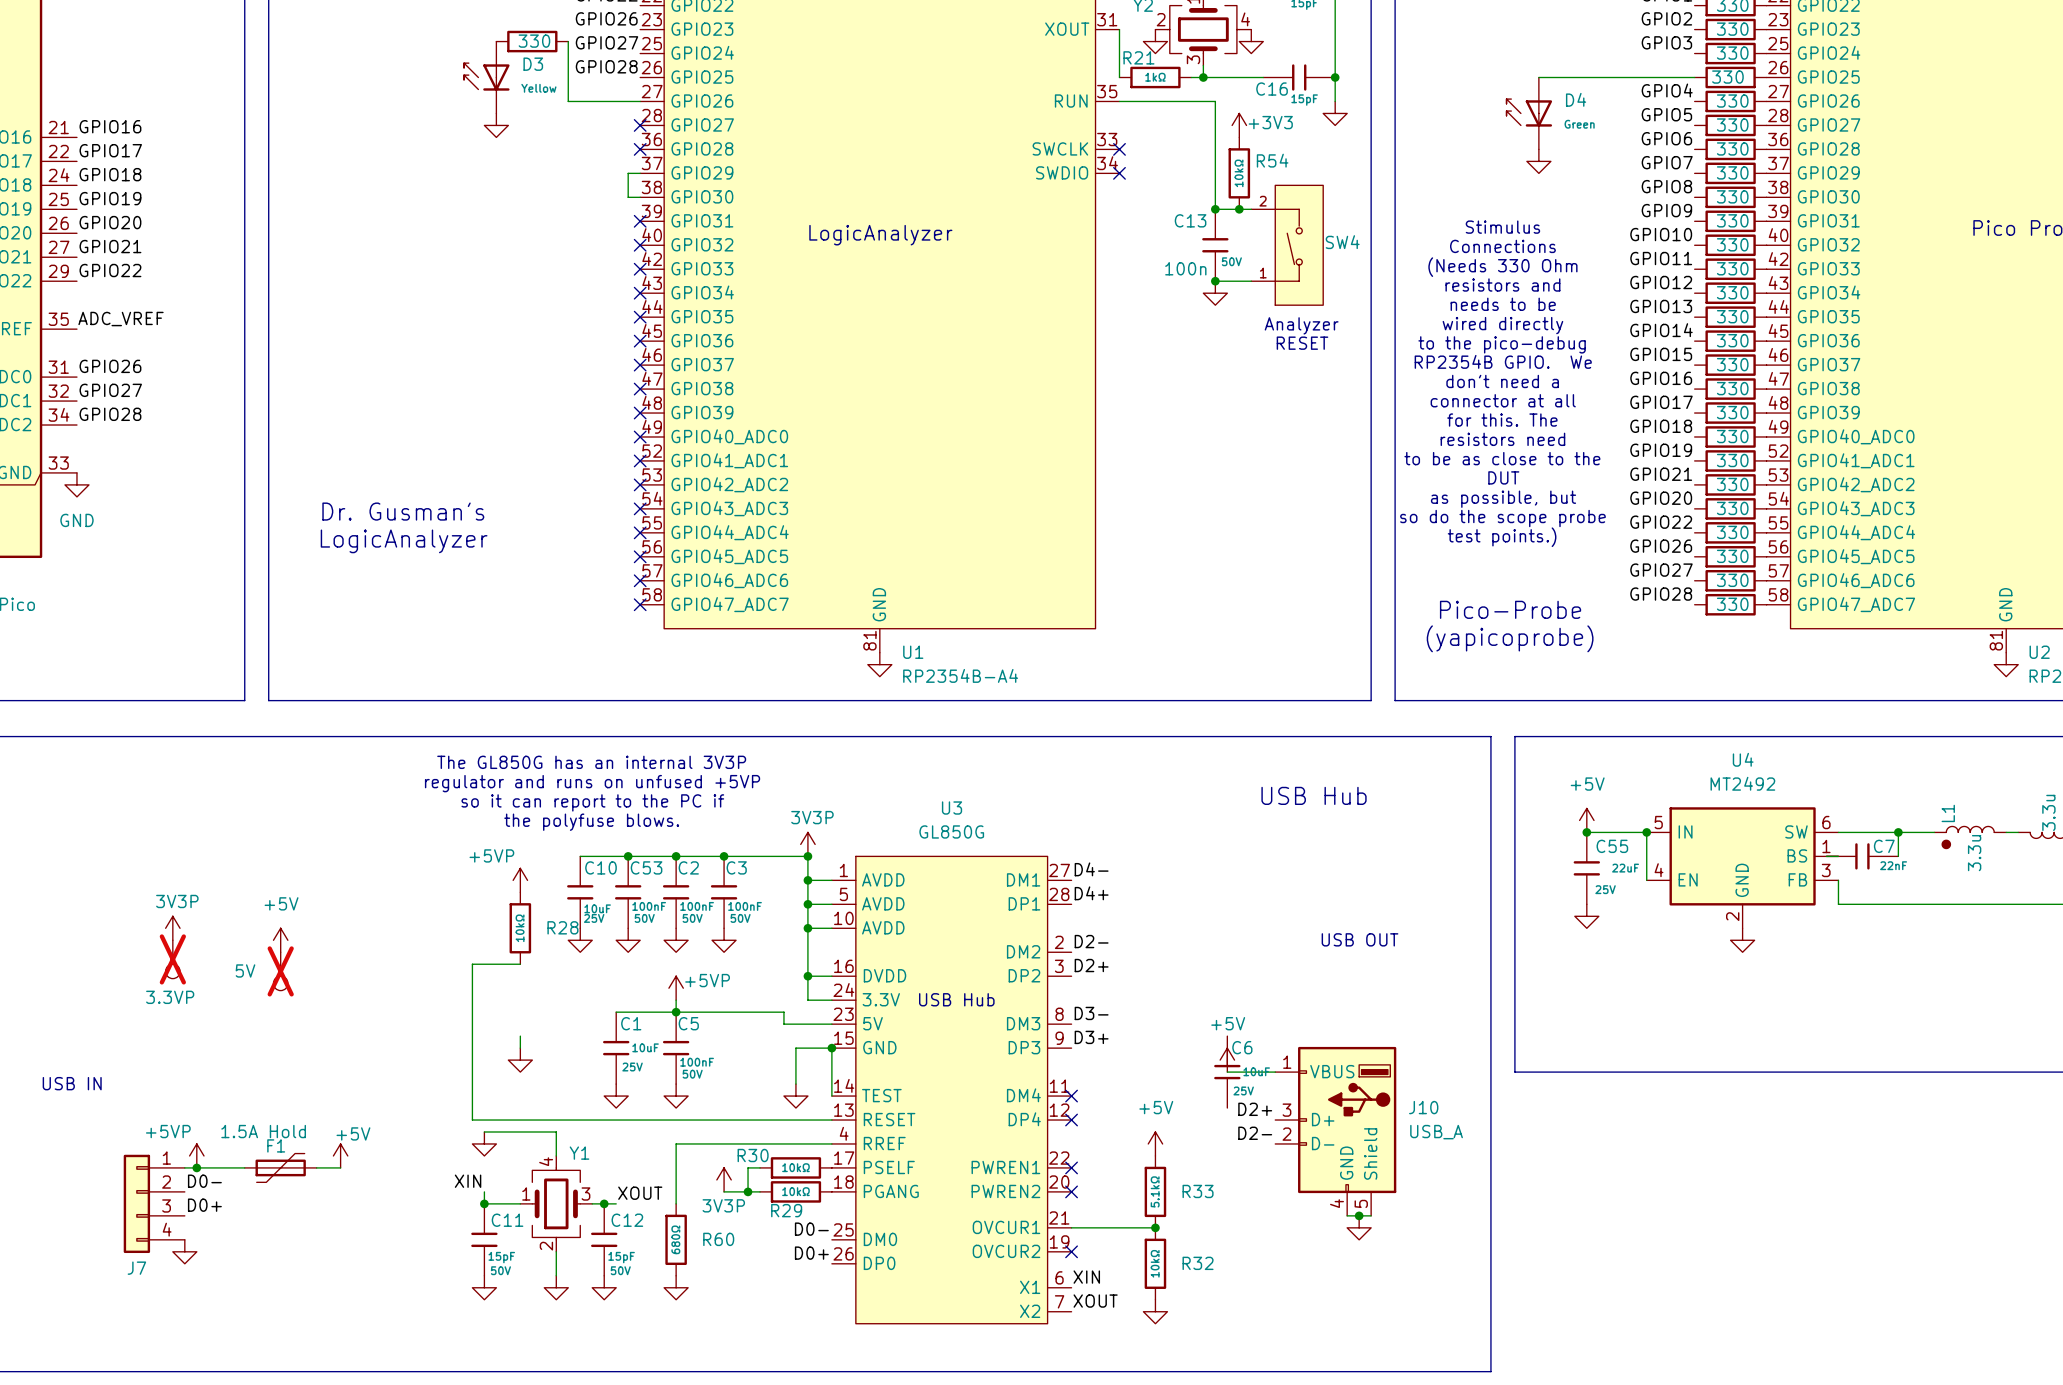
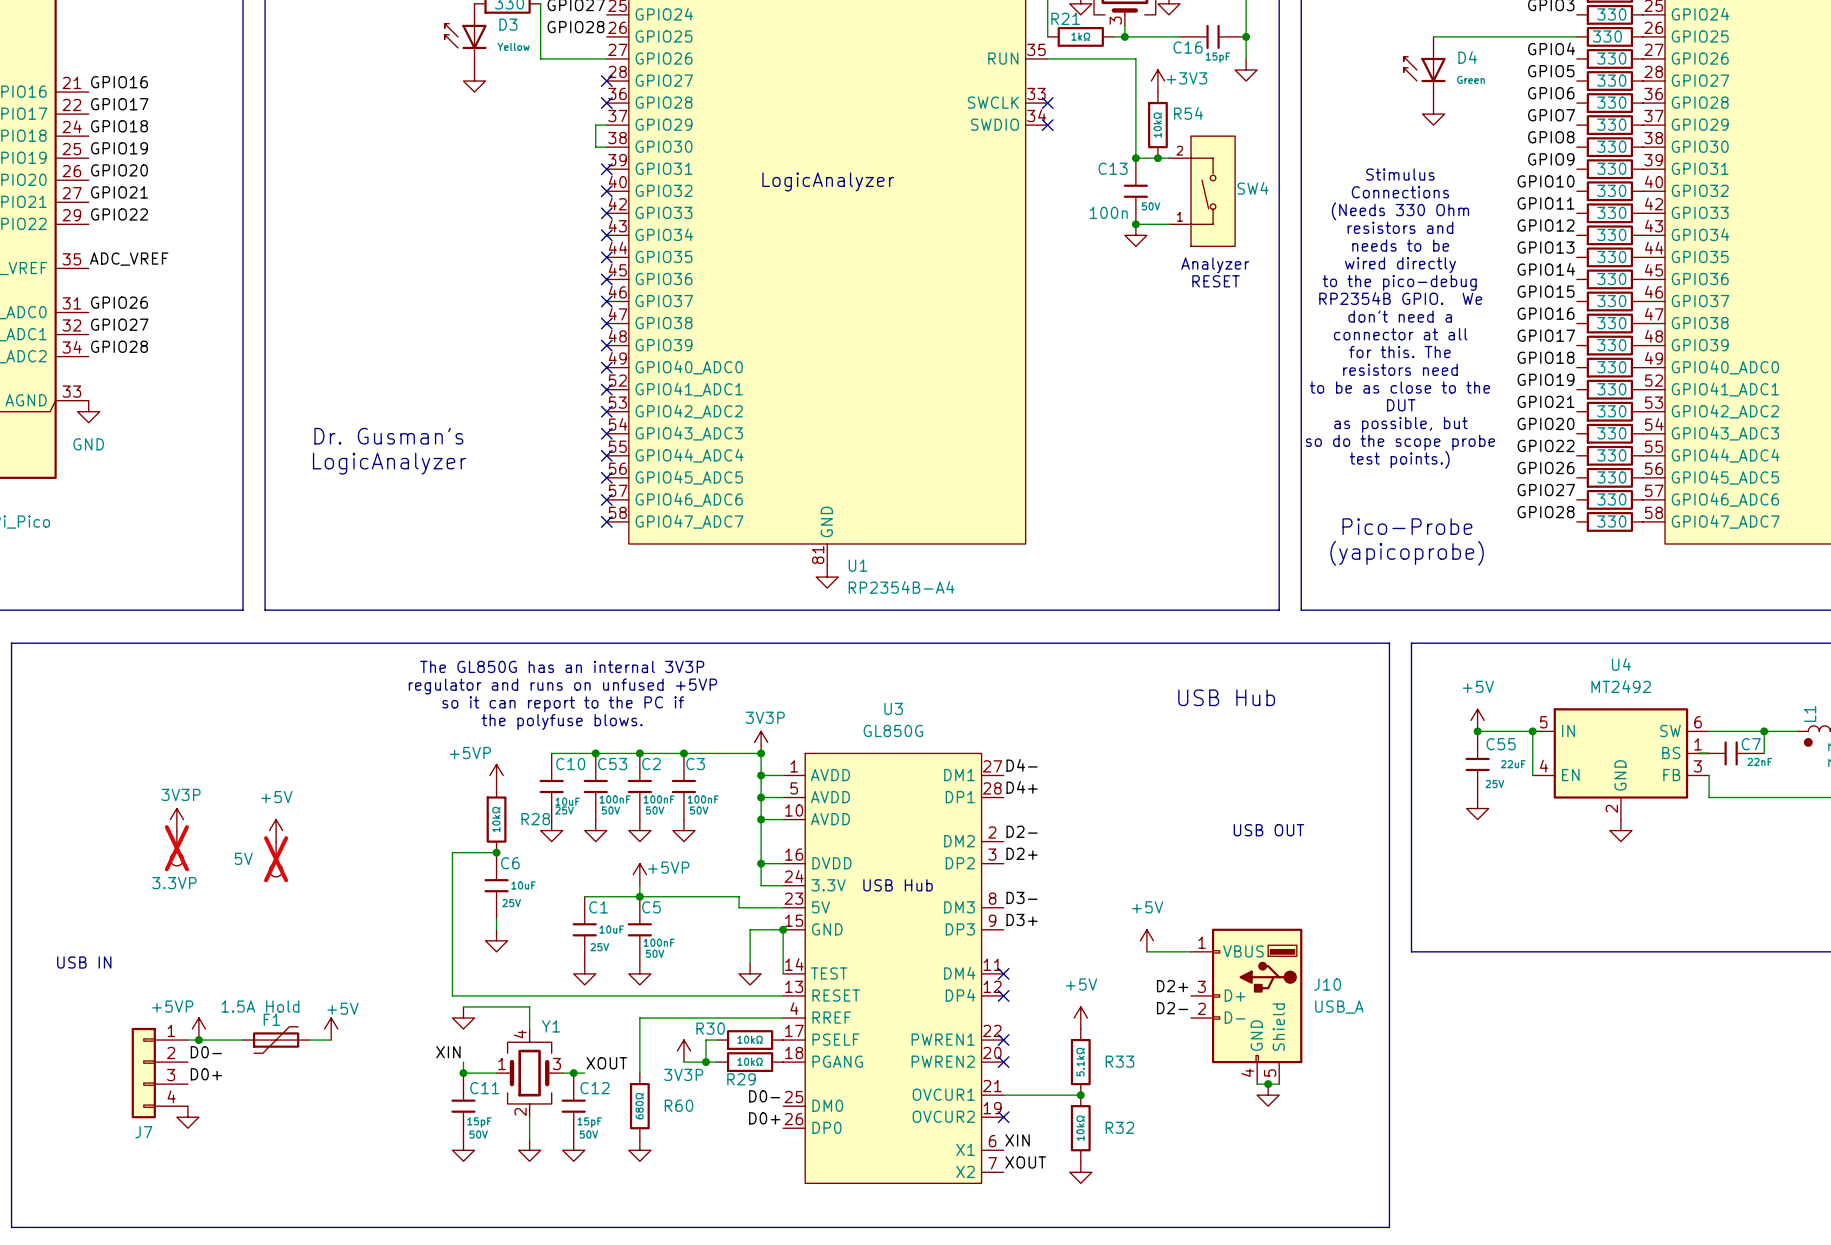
junction: none -> (496, 852)
C6 position: (1227, 1072) -> (496, 885)

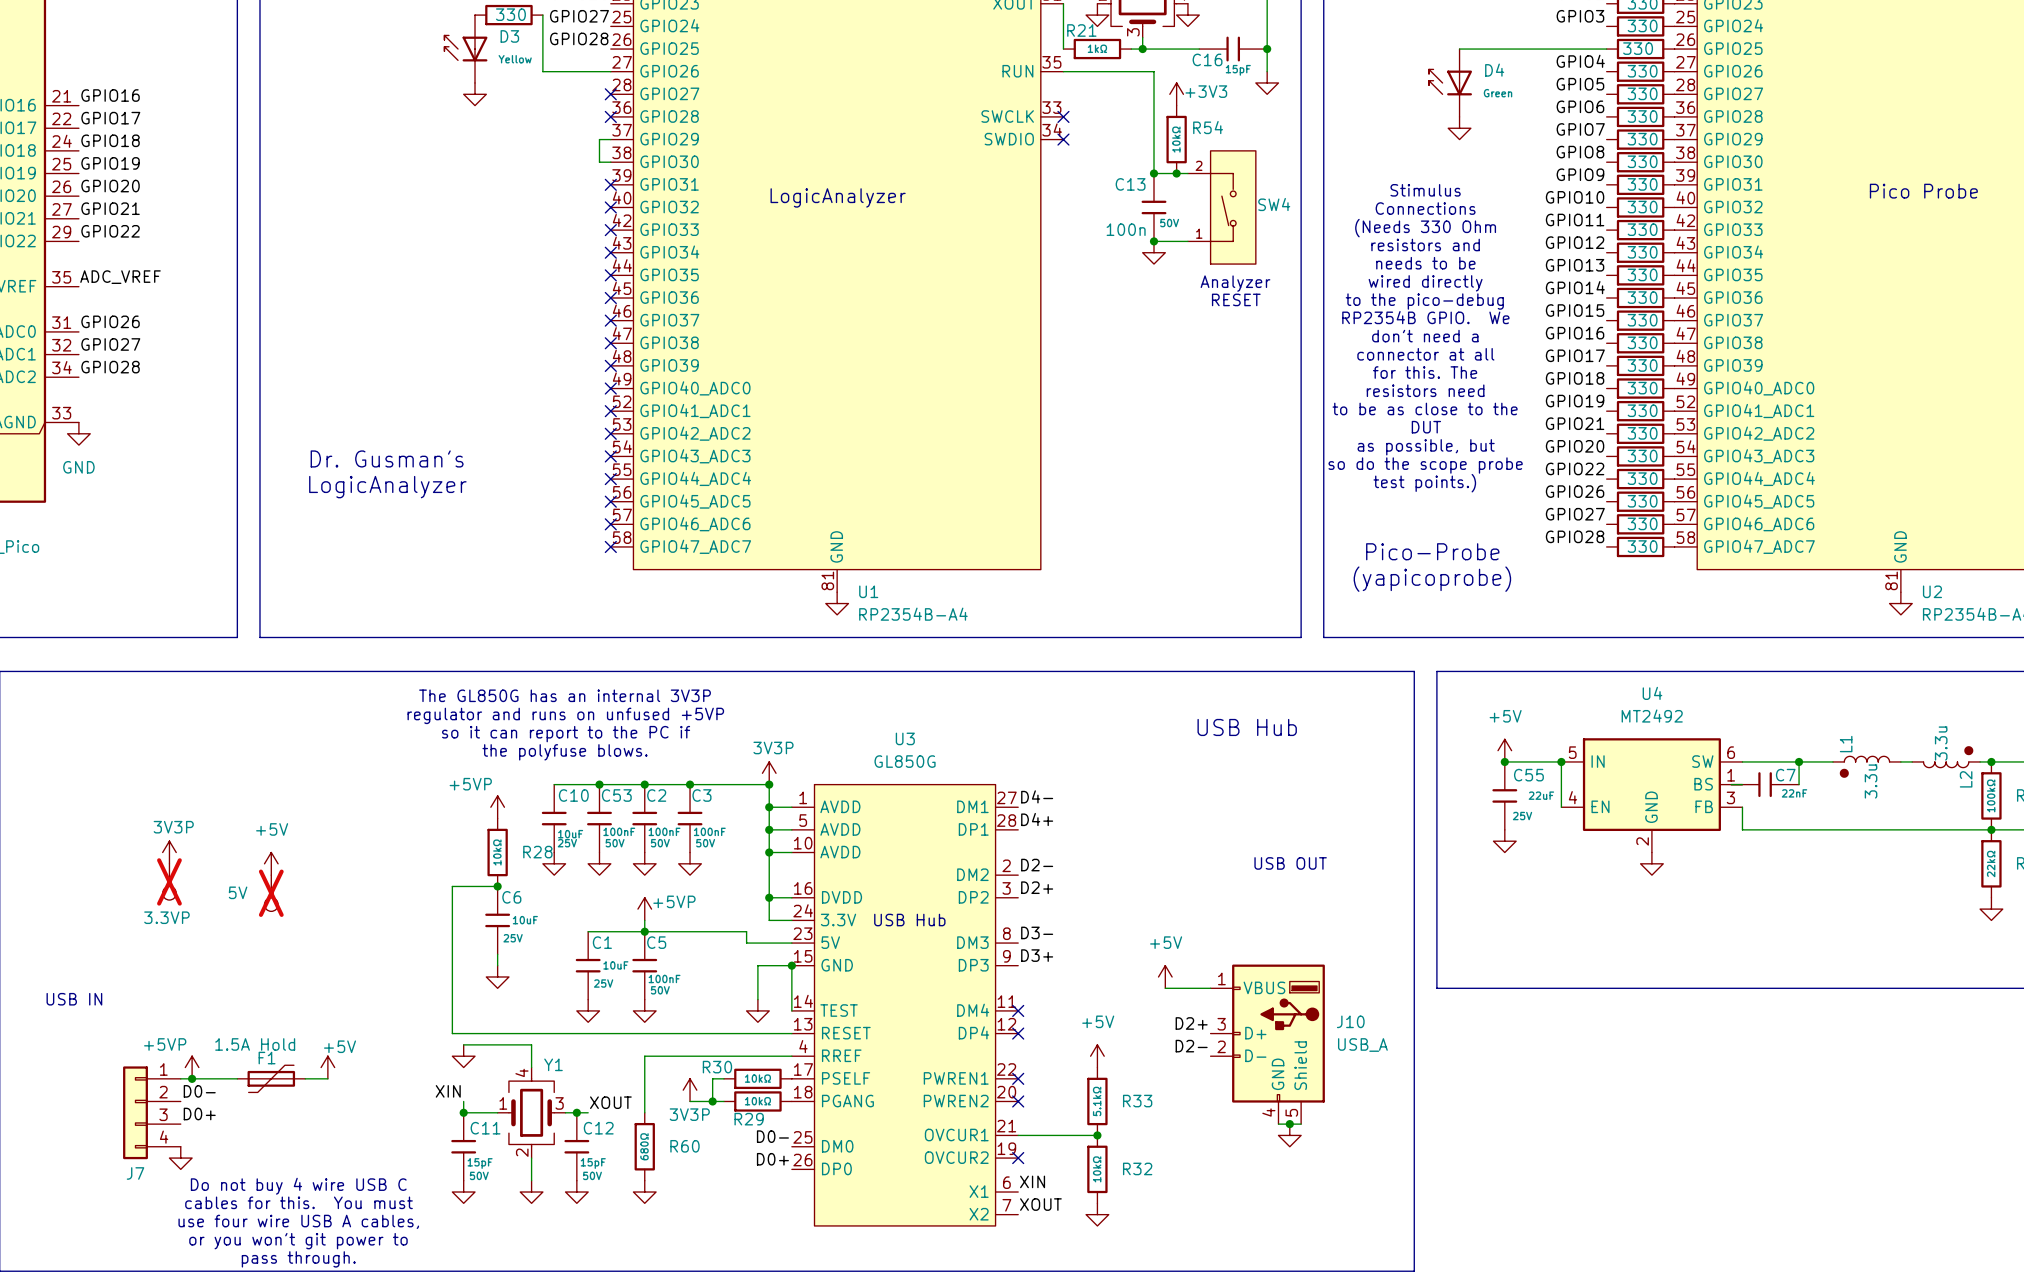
text: none -> Do not buy 4 wire USB C (298, 1186)
text: none -> cables for this. You must (299, 1202)
text: none -> use four wire USB A cables, (298, 1221)
text: none -> or you won't git power to (298, 1241)
text: none -> pass through. (298, 1259)

